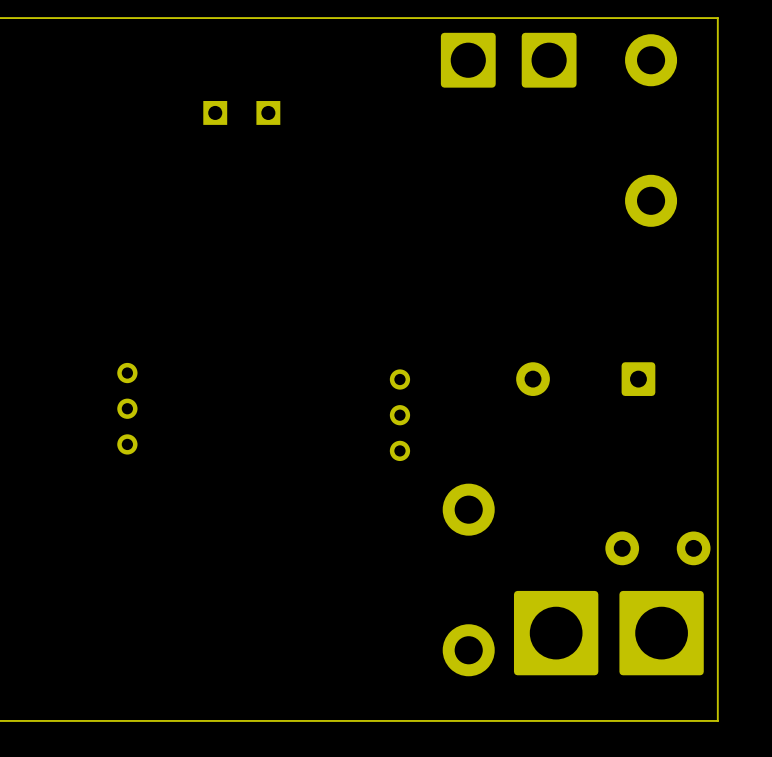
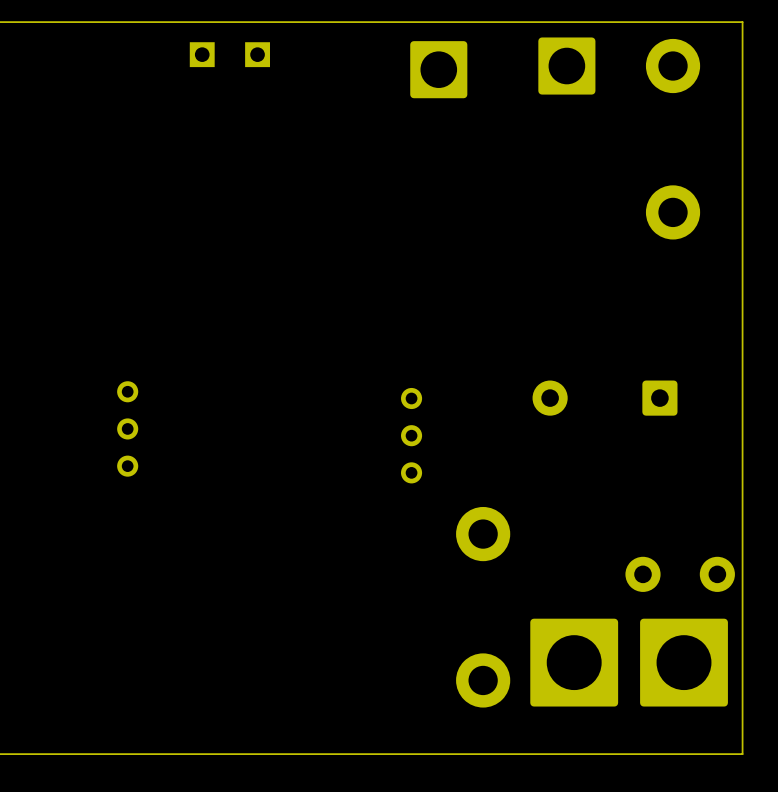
part: none -> (202, 54)
part: none -> (257, 54)
part position: (468, 60) -> (438, 69)
part: (215, 112) -> none
part: (268, 112) -> none

